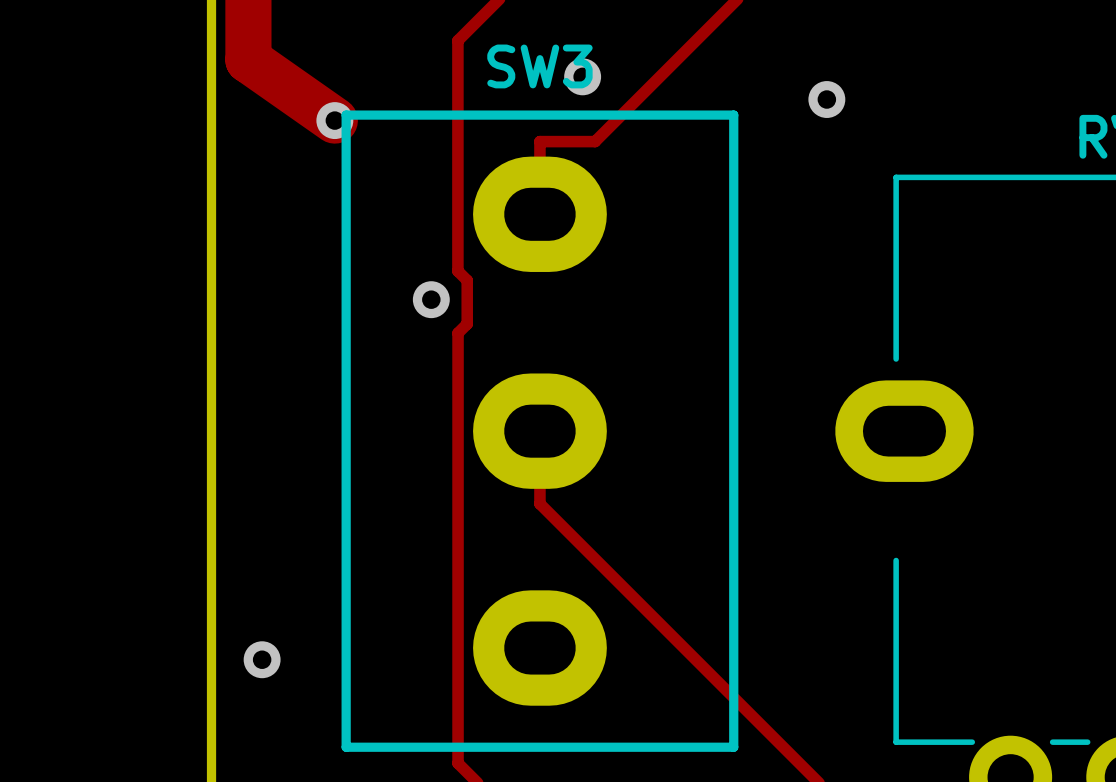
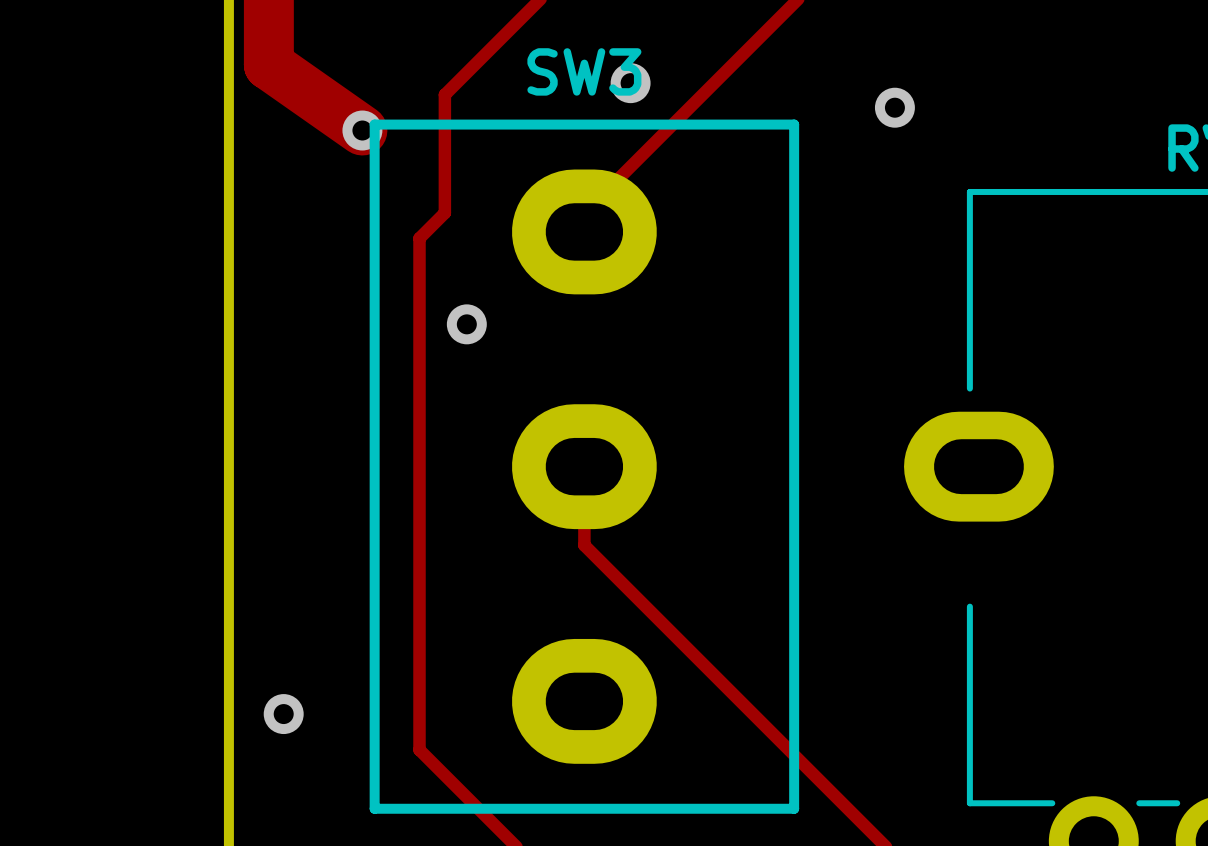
track: (457, 40) (457, 271) (467, 280) (467, 323) (458, 333) (458, 763) -> (495, 44) (444, 94) (444, 212) (419, 238) (419, 749) (495, 826)
track: (595, 141) (539, 141) (539, 196) -> (644, 153) (584, 212)

